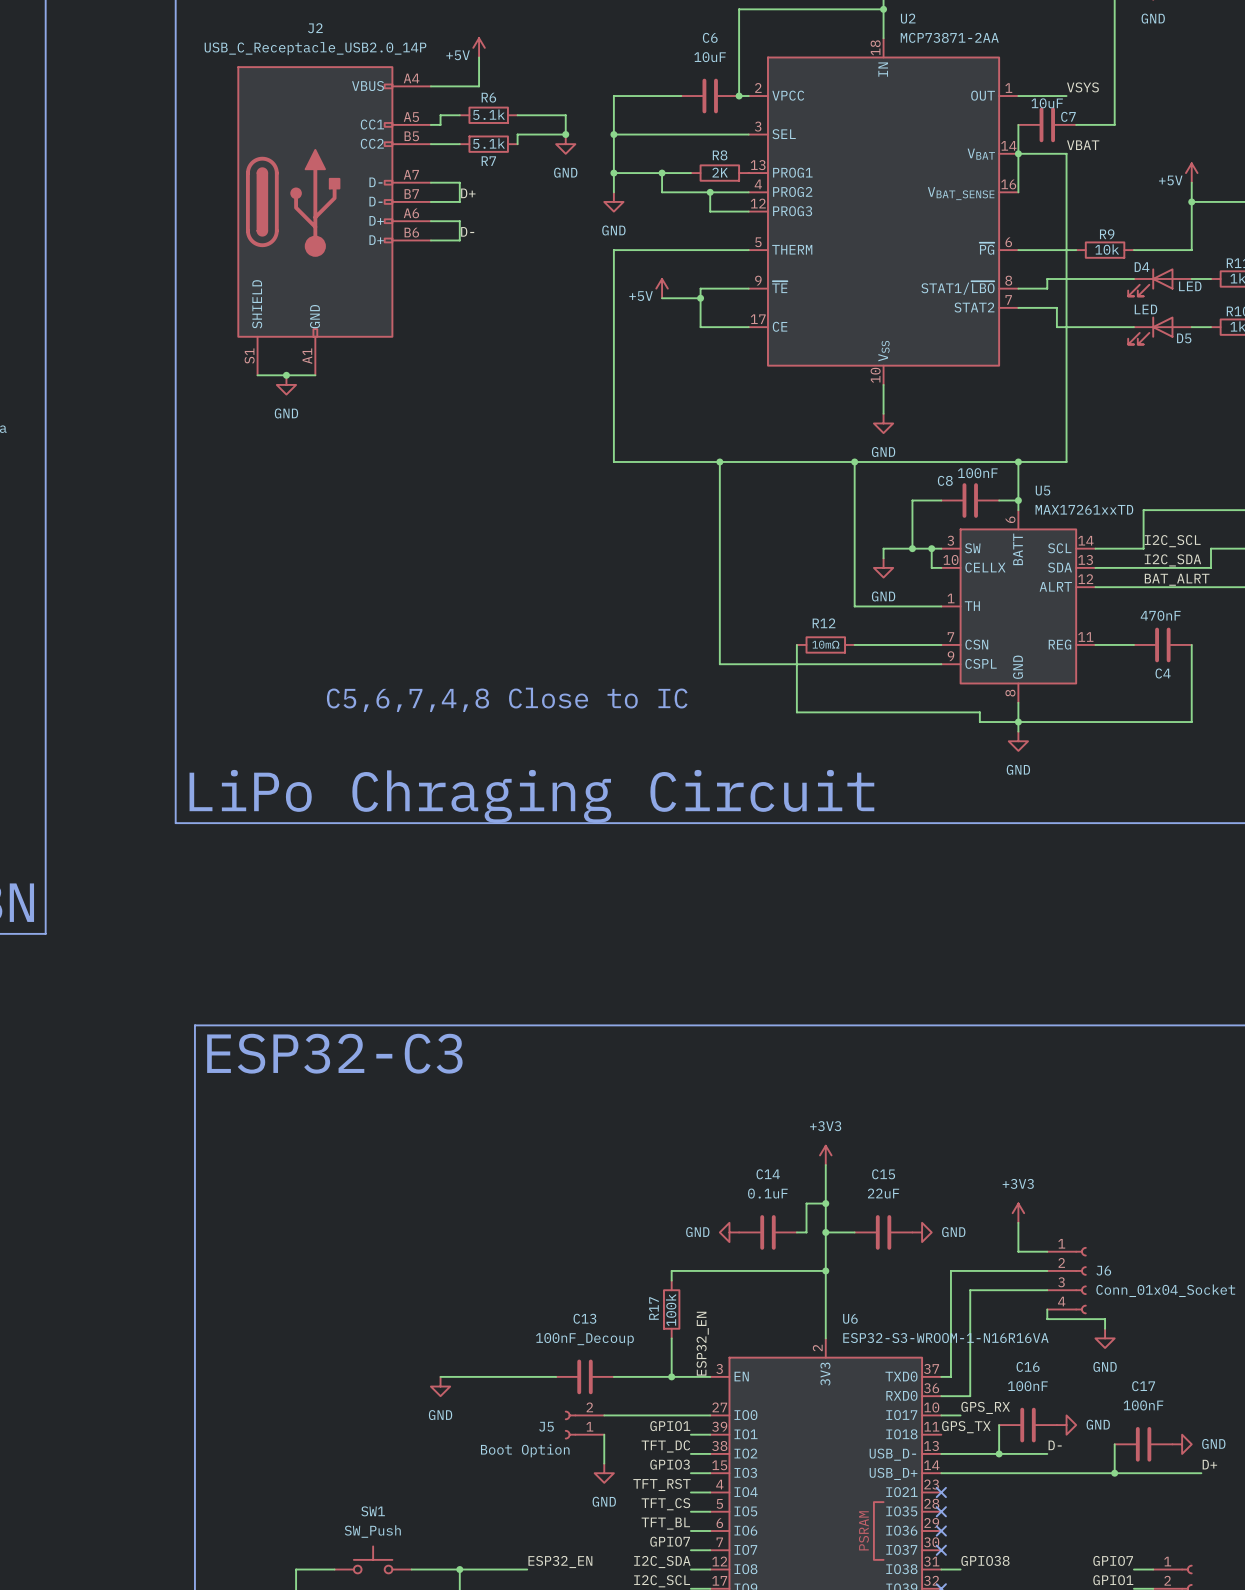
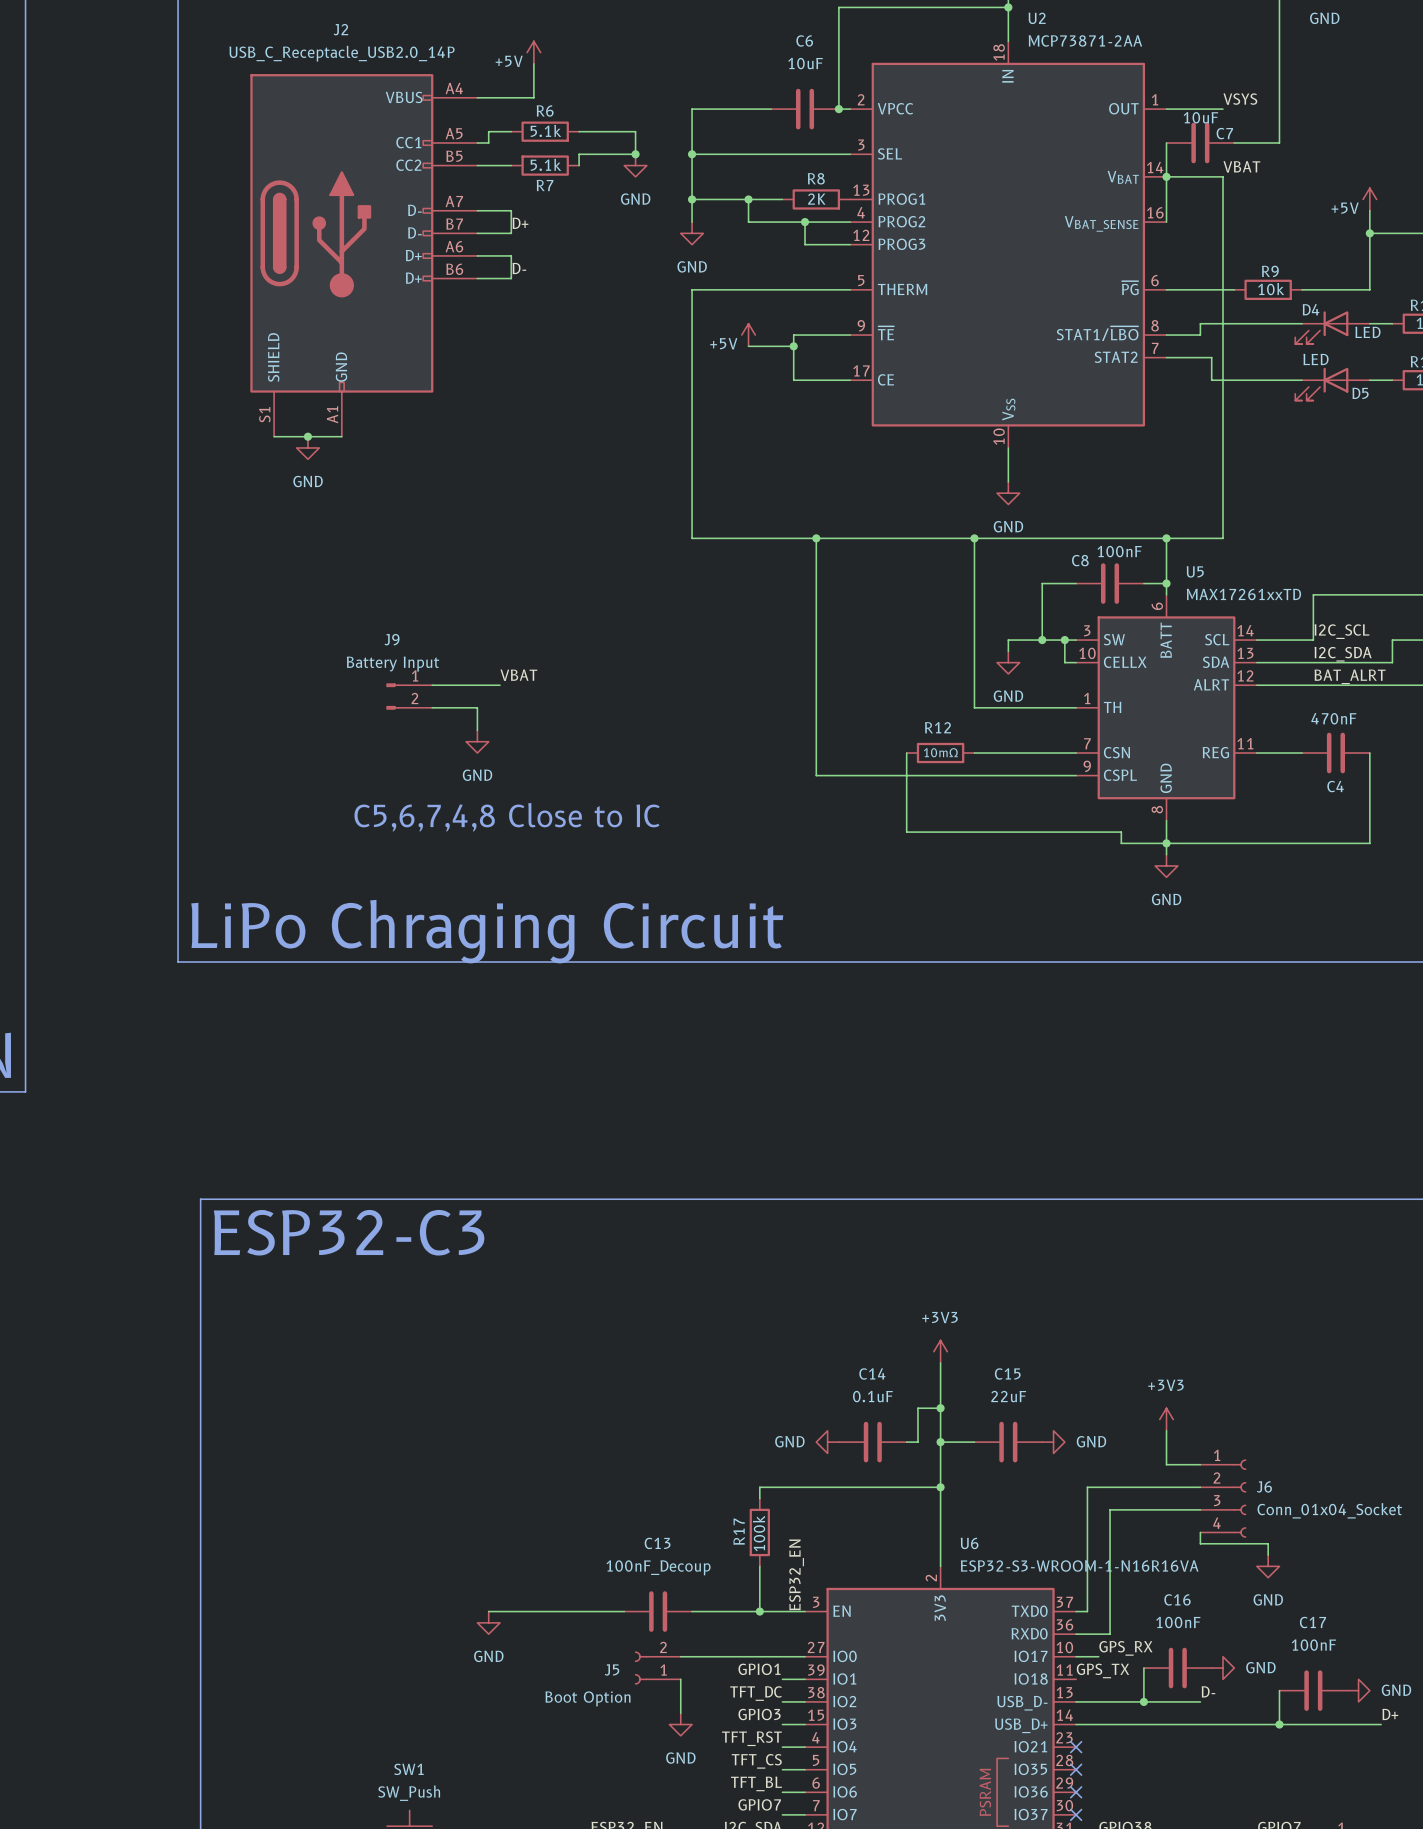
label: none -> VBAT (518, 675)
wire: none -> (432, 685) (500, 685)
J9: none -> Battery Input (409, 696)
wire: none -> (432, 707) (477, 707) (477, 730)
power symbol: none -> GND (477, 741)

